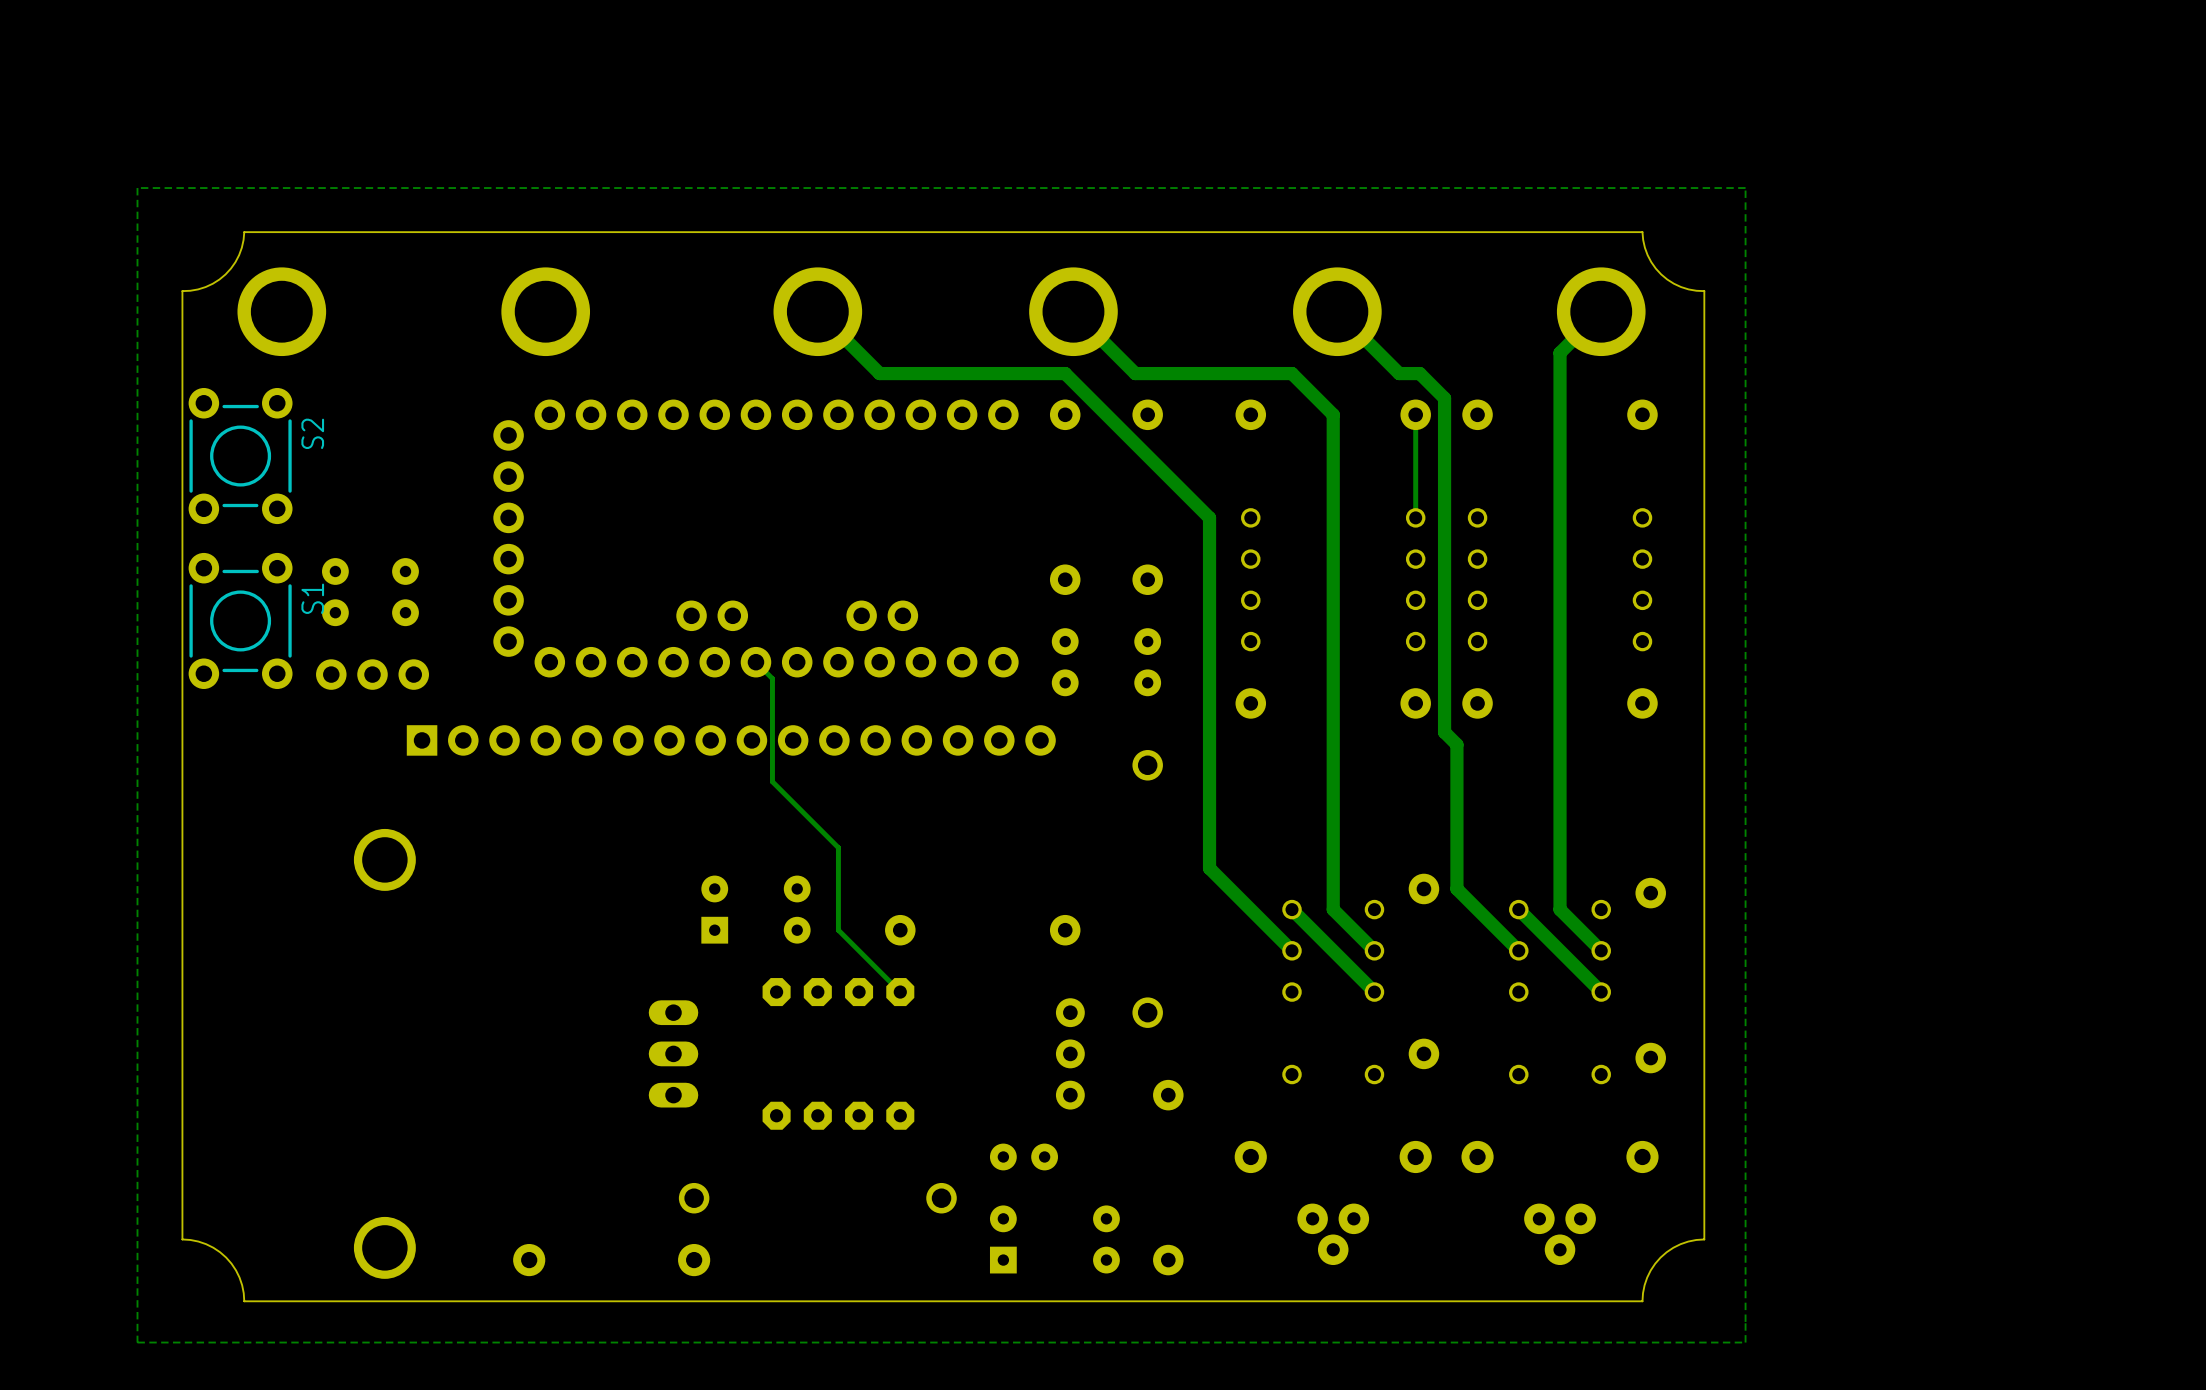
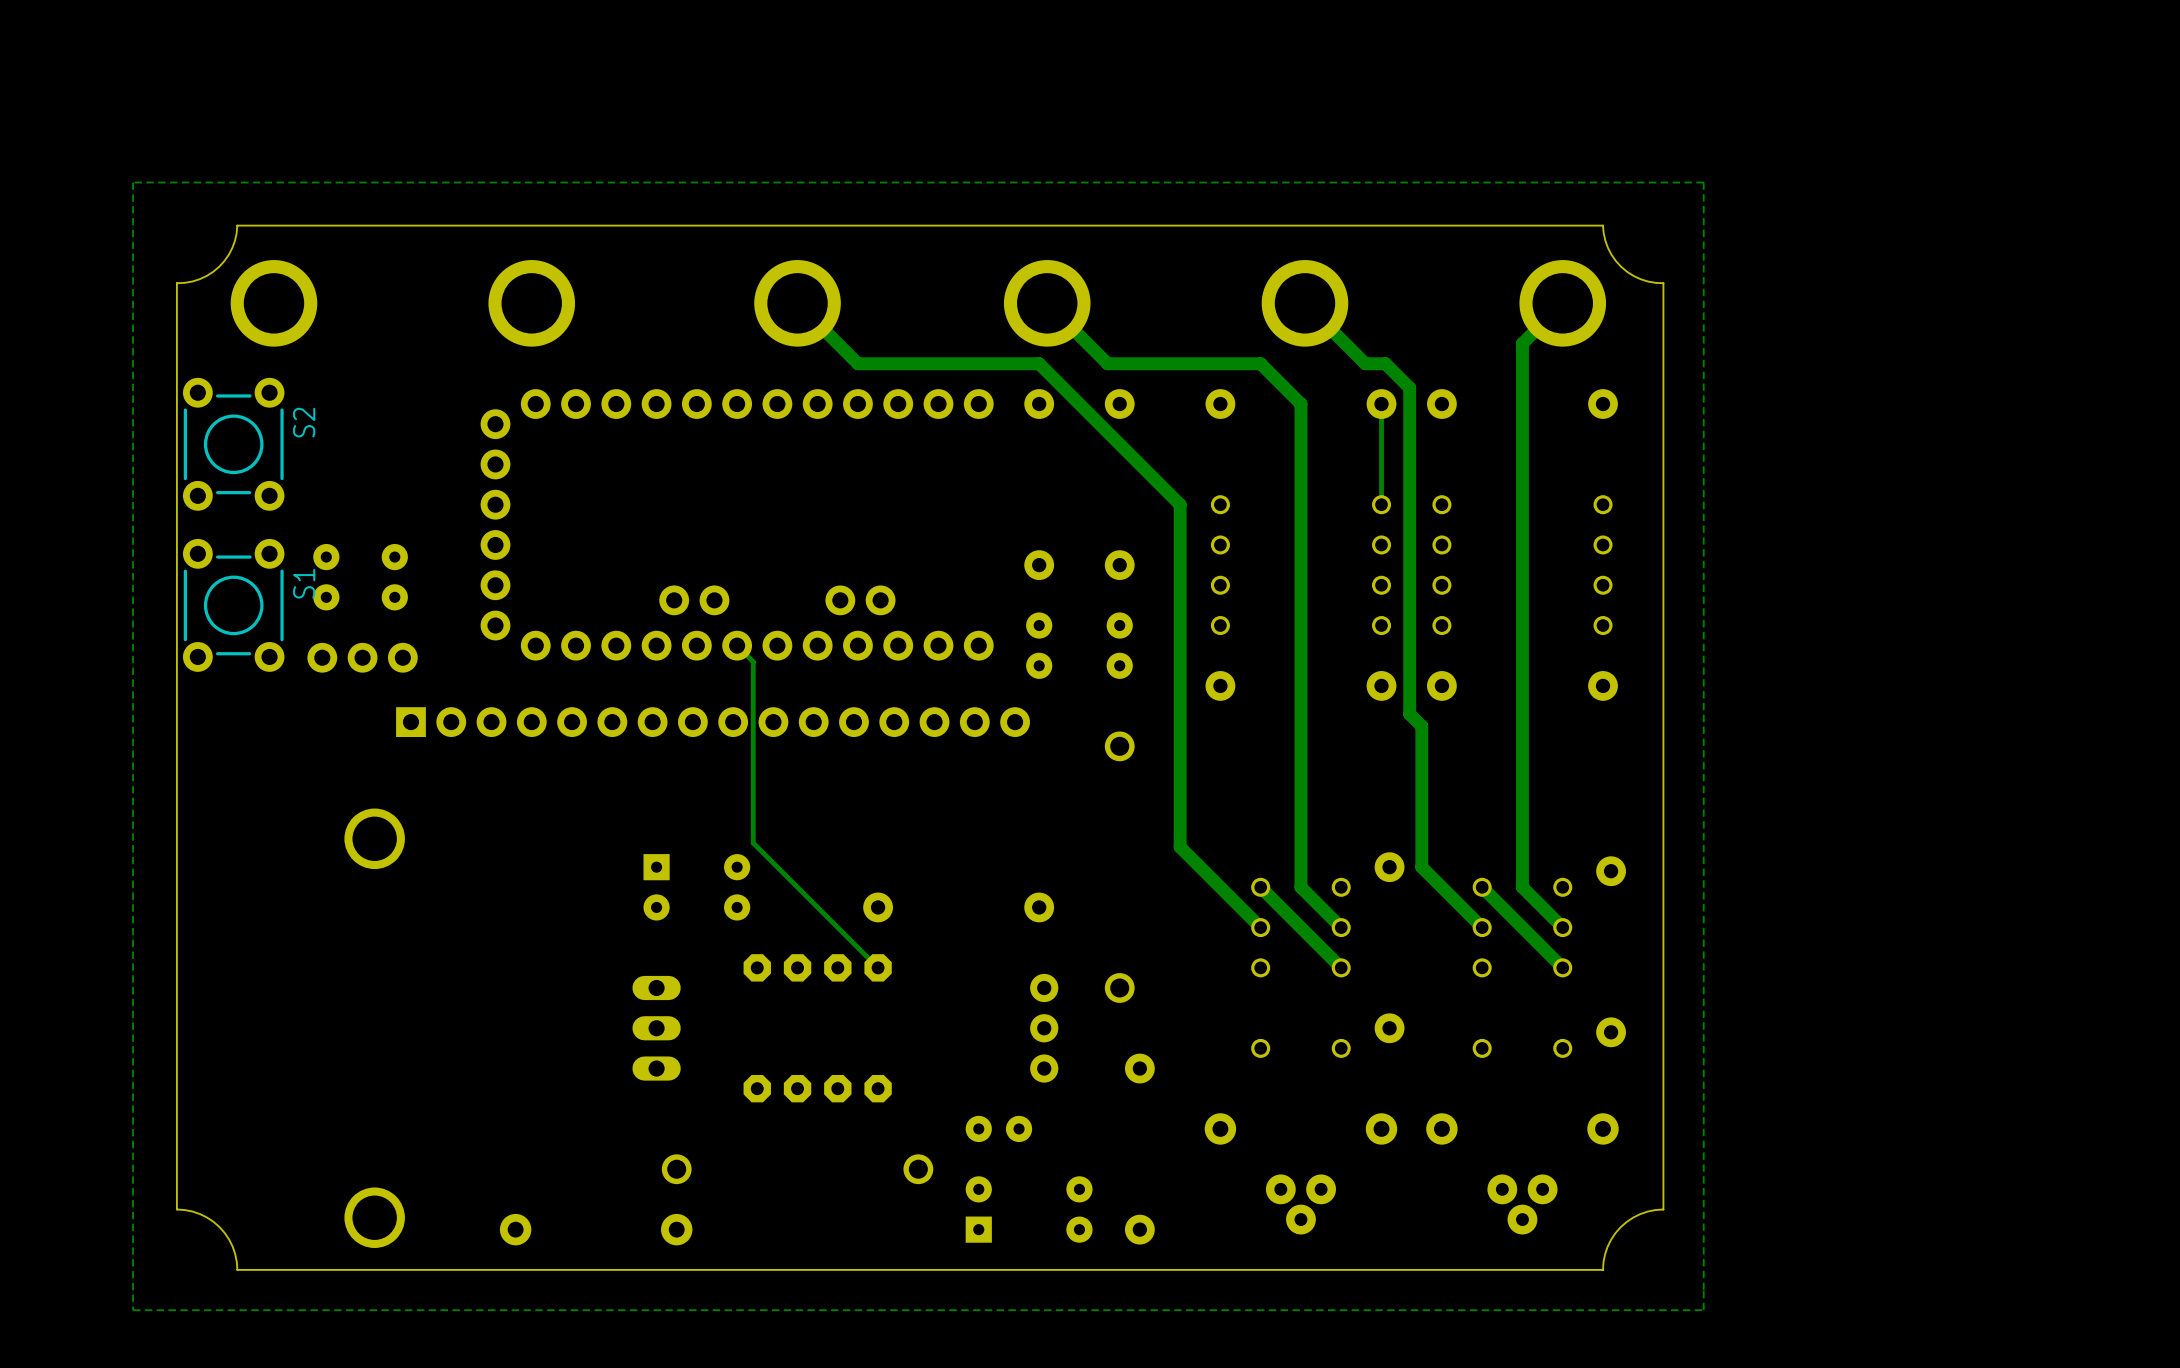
track: (772, 781) (838, 847) (838, 930) -> (753, 762) (753, 843) (817, 907)
part rotation: 0° (714, 909) -> 180° (656, 887)
part position: (714, 909) -> (656, 887)
part position: (797, 909) -> (737, 887)

